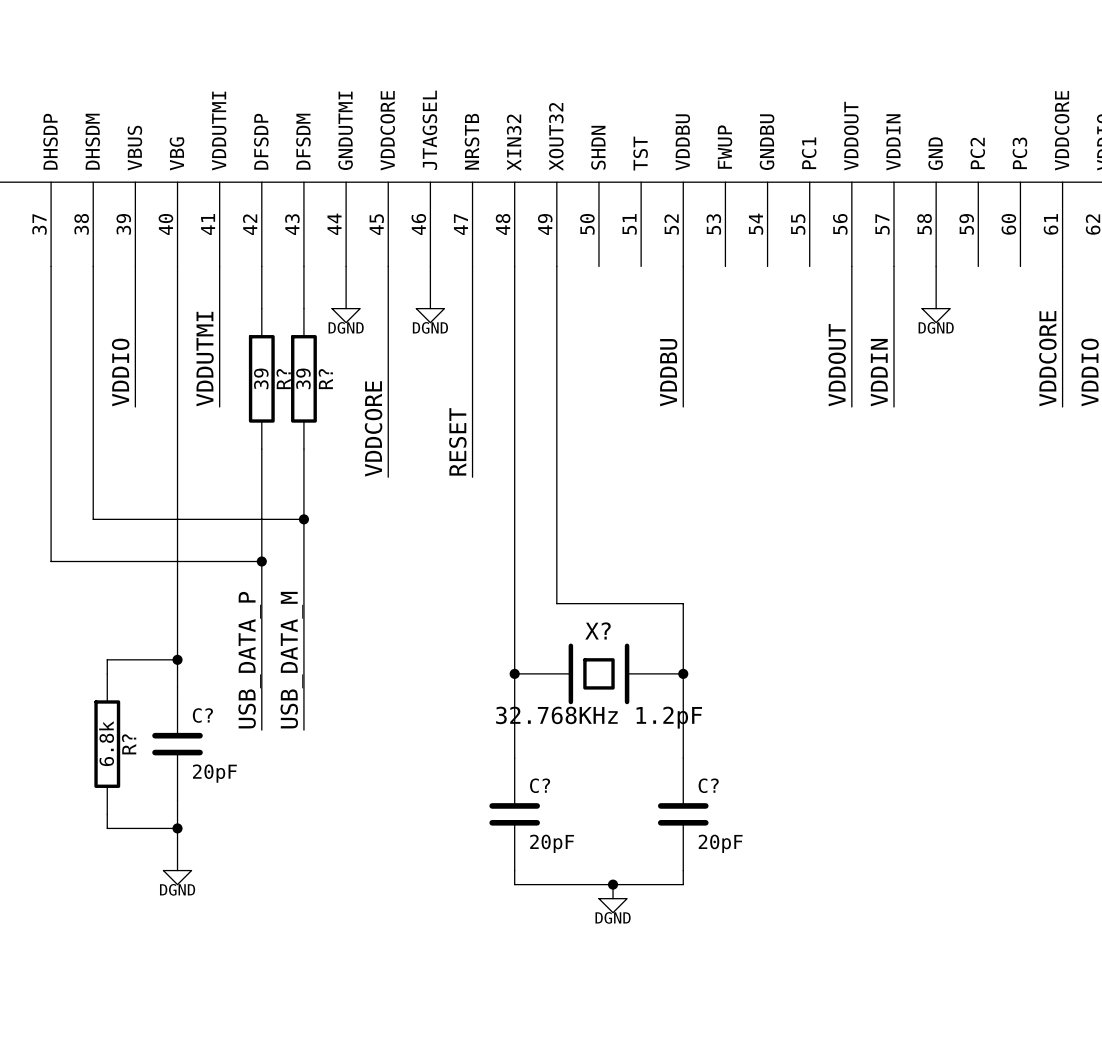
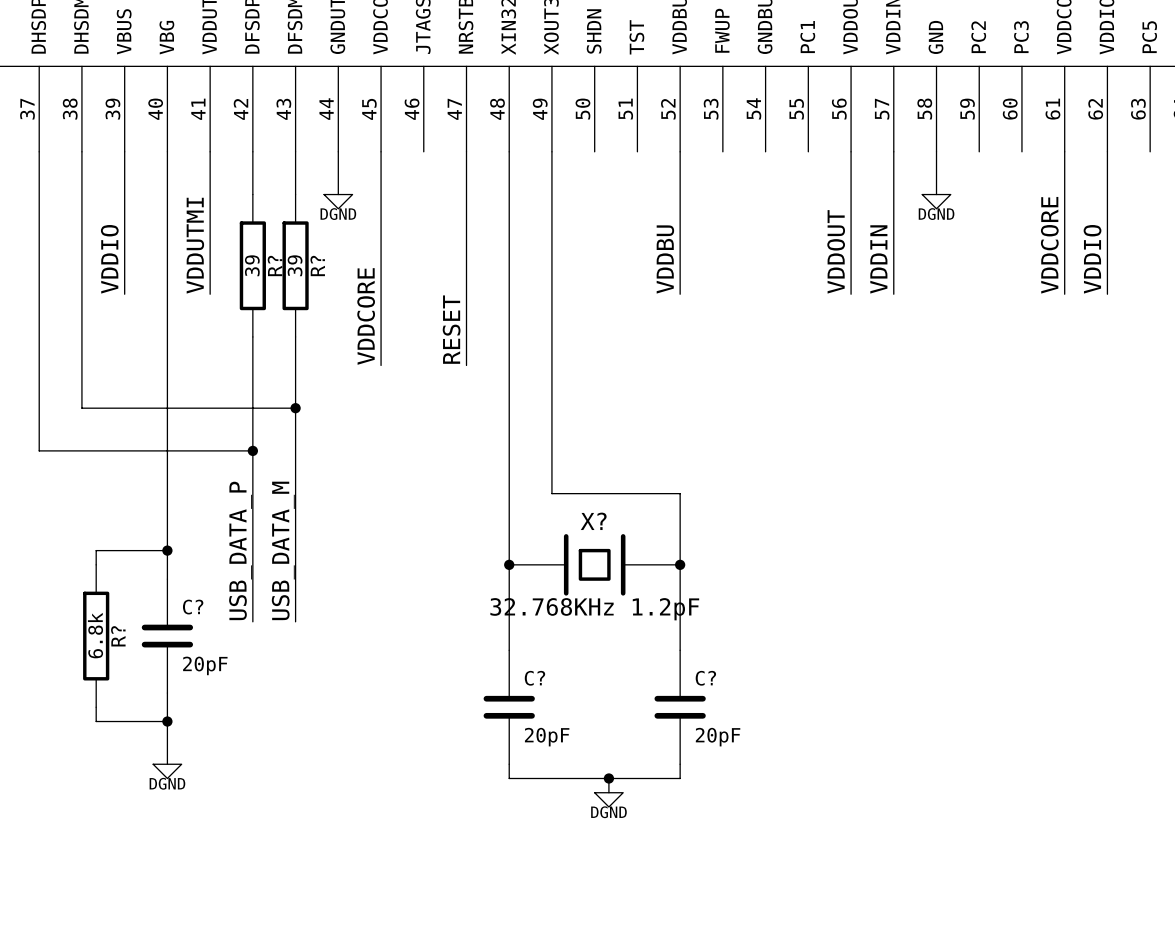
wire: (430, 266) (430, 308) -> none
power symbol: DGND (430, 315) -> none

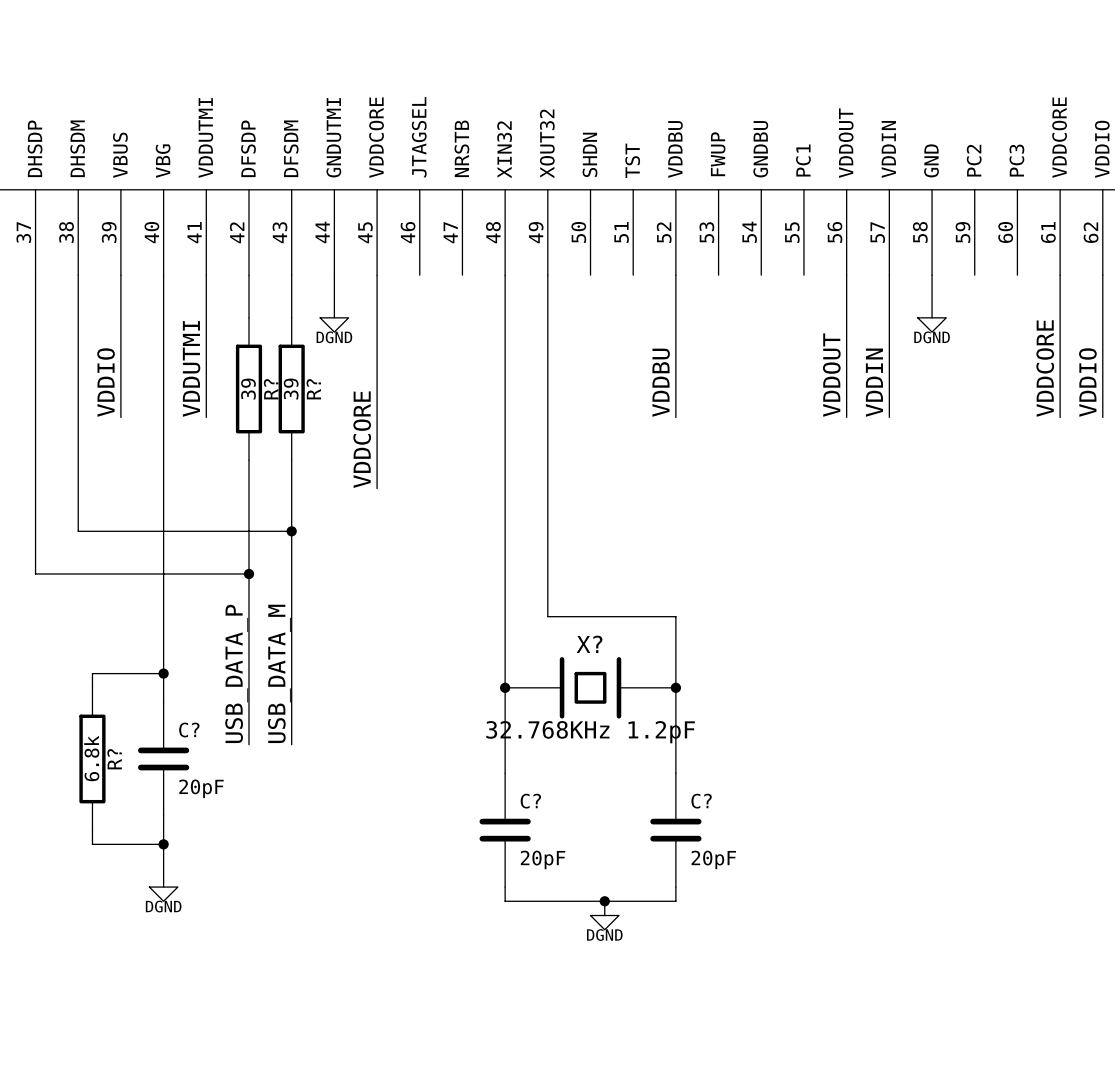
wire: (466, 151) (466, 365) -> none
label: RESET (451, 329) -> none

